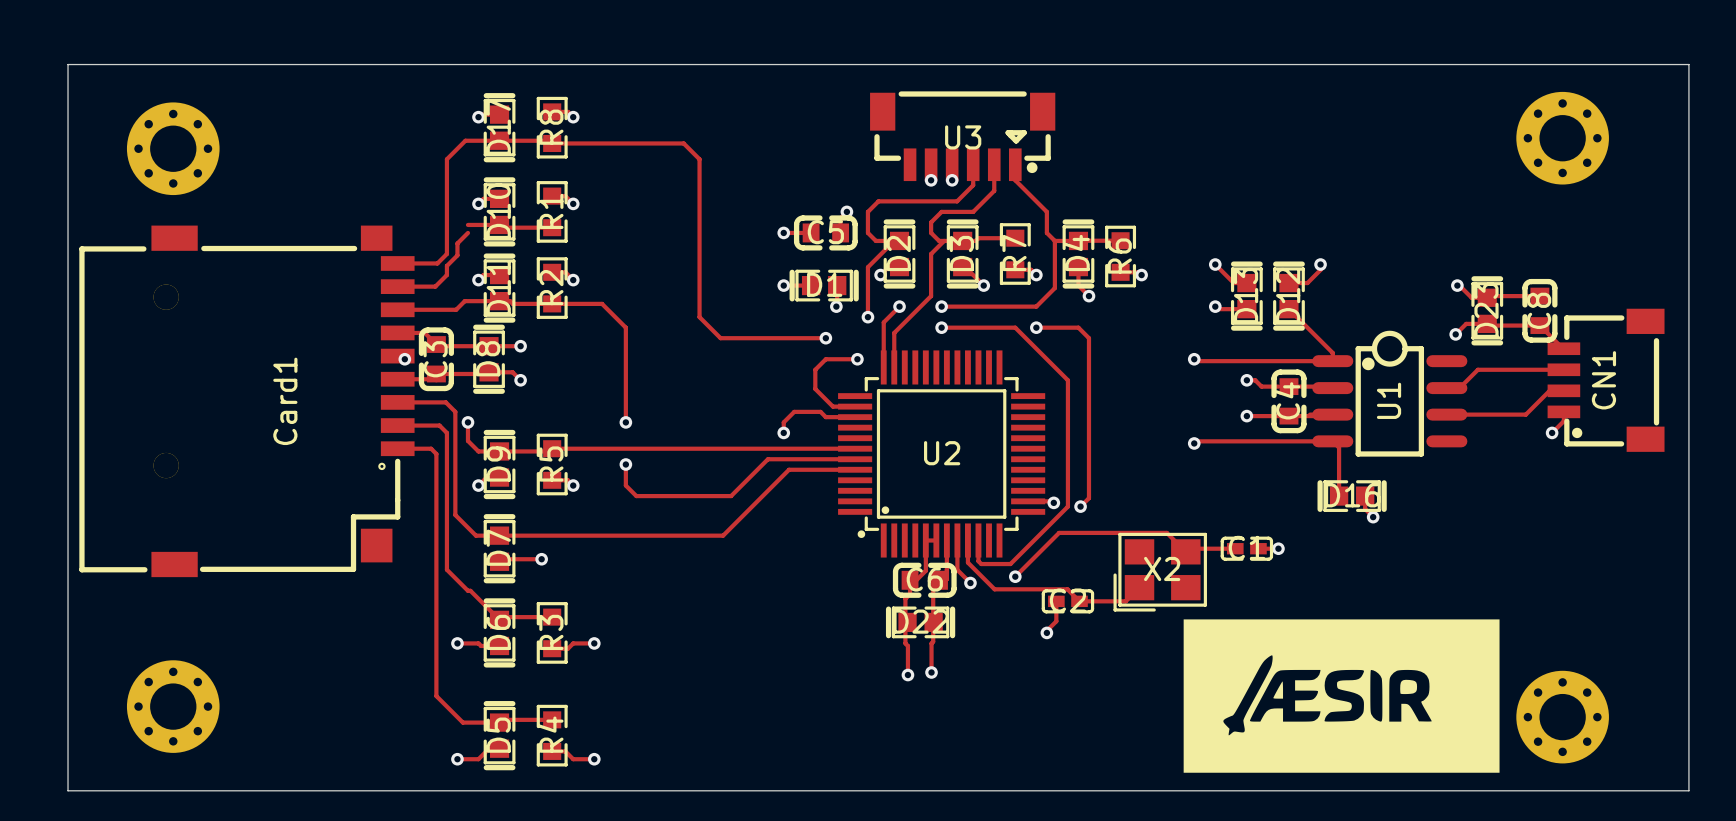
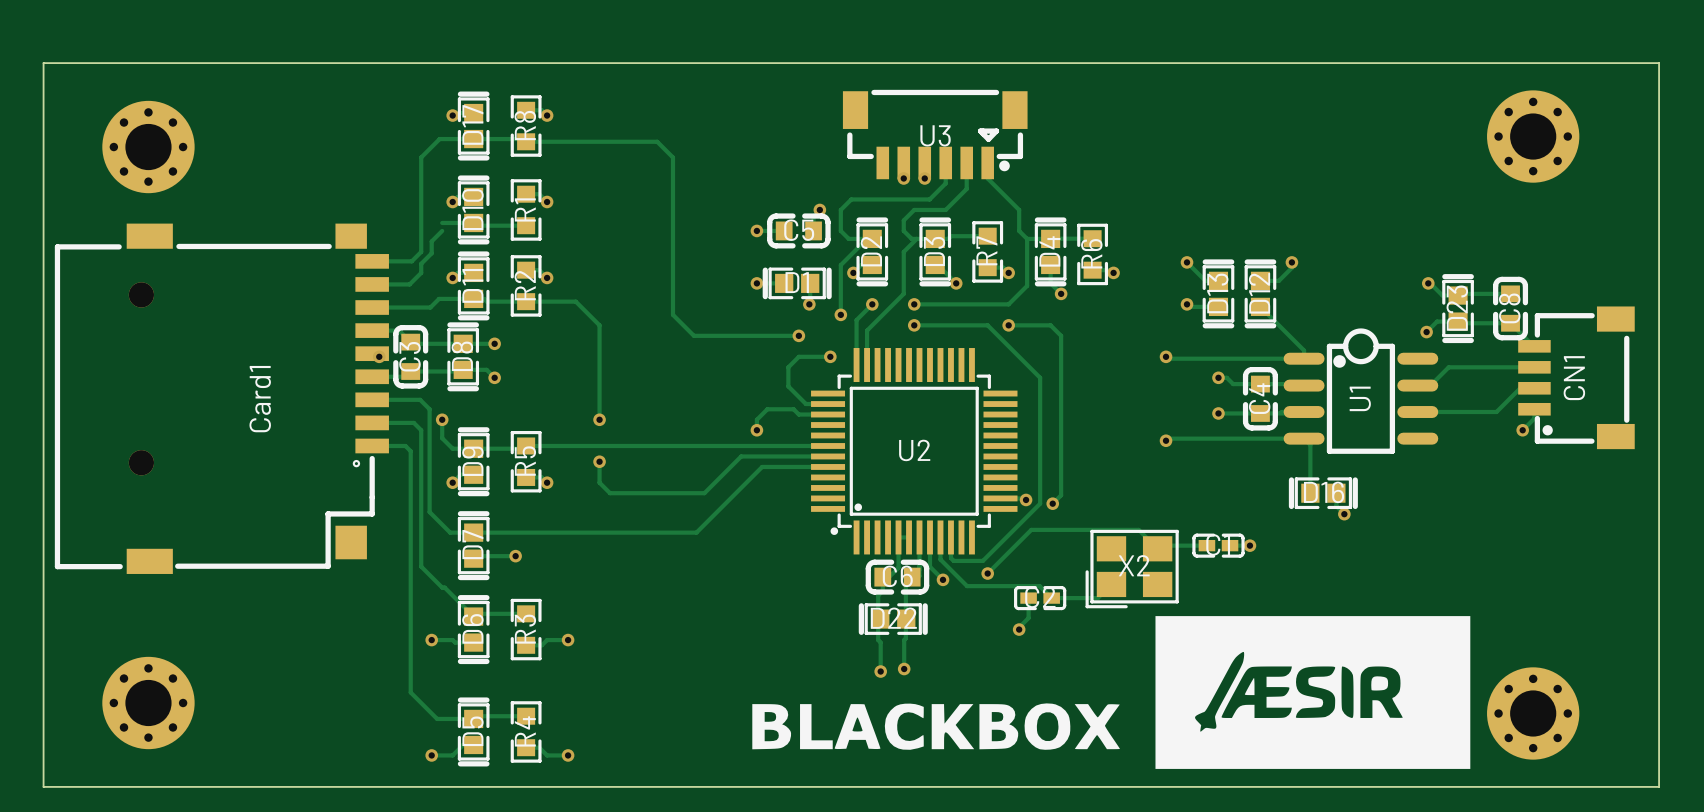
drawing: none -> [752, 703, 1120, 750]

